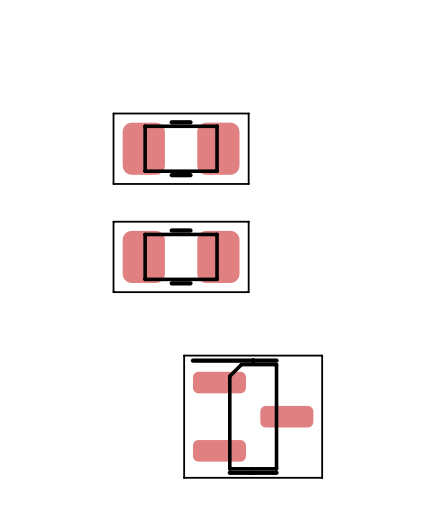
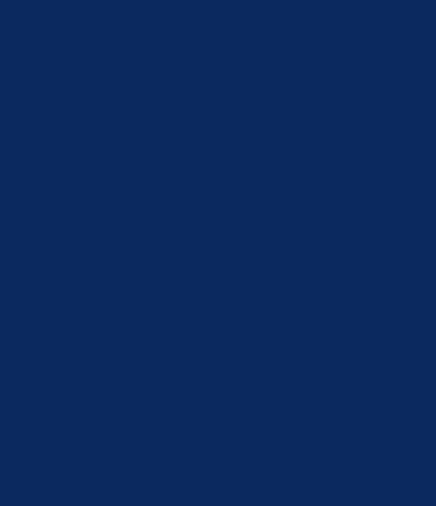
part: (181, 148) -> none
part: (181, 256) -> none
part: (253, 416) -> none

